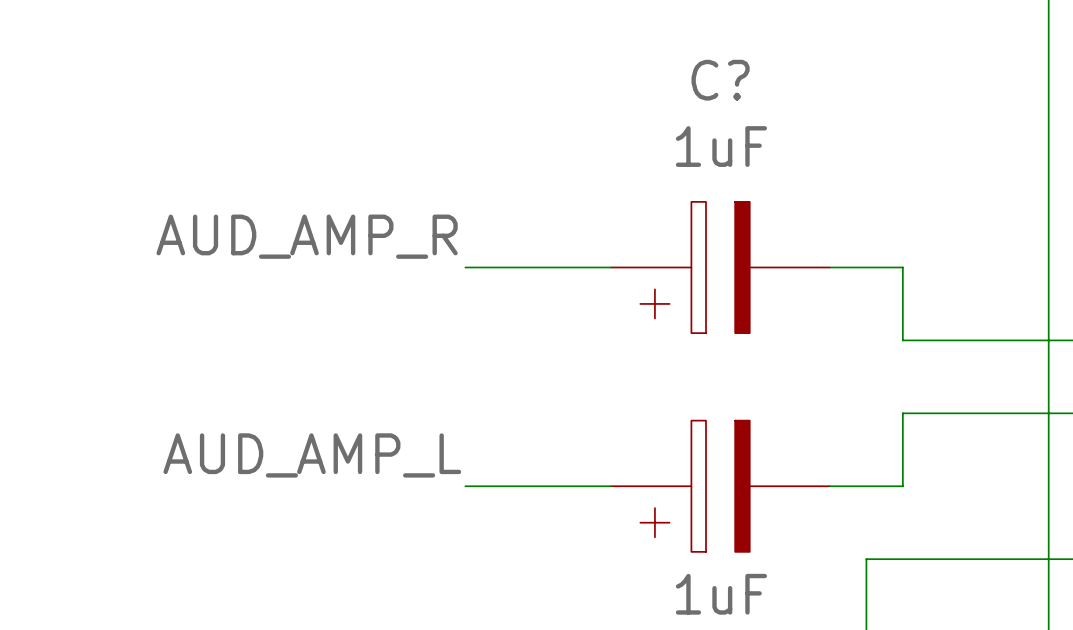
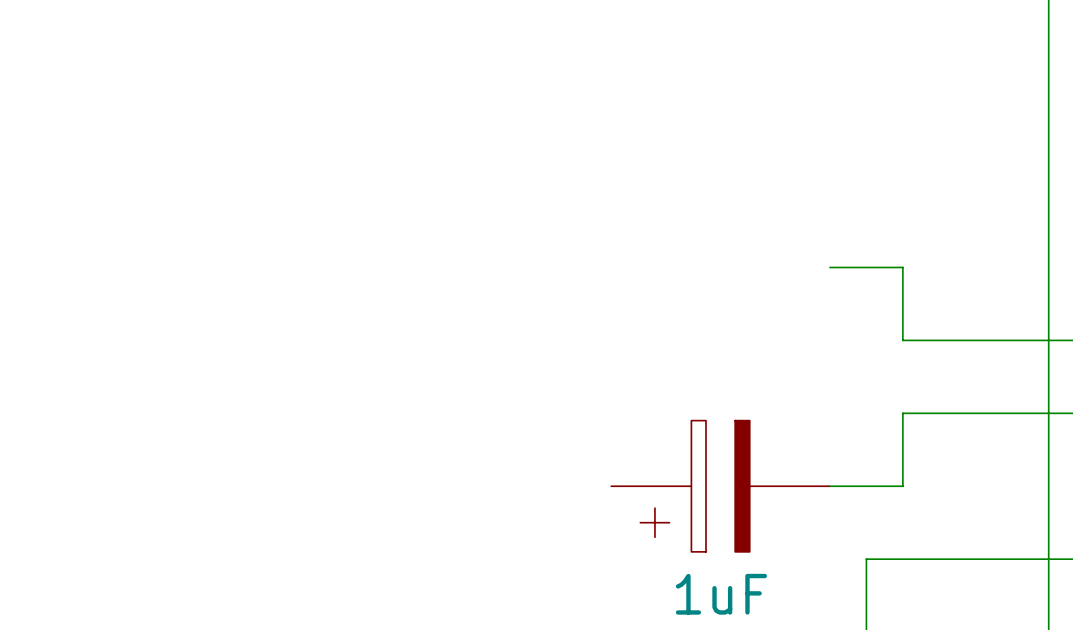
label: AUD_AMP_R (307, 236) -> none
wire: (465, 267) (611, 267) -> none
C?: 1uF (720, 267) -> none
label: AUD_AMP_L (312, 455) -> none
wire: (465, 486) (611, 486) -> none

